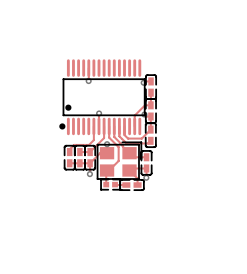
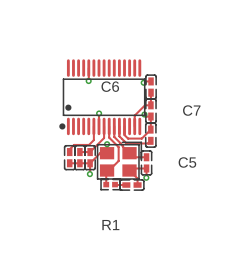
C6 name: none -> C6 (110, 86)
C7 name: none -> C7 (191, 110)
C5 name: none -> C5 (187, 162)
R1 name: none -> R1 (110, 225)

